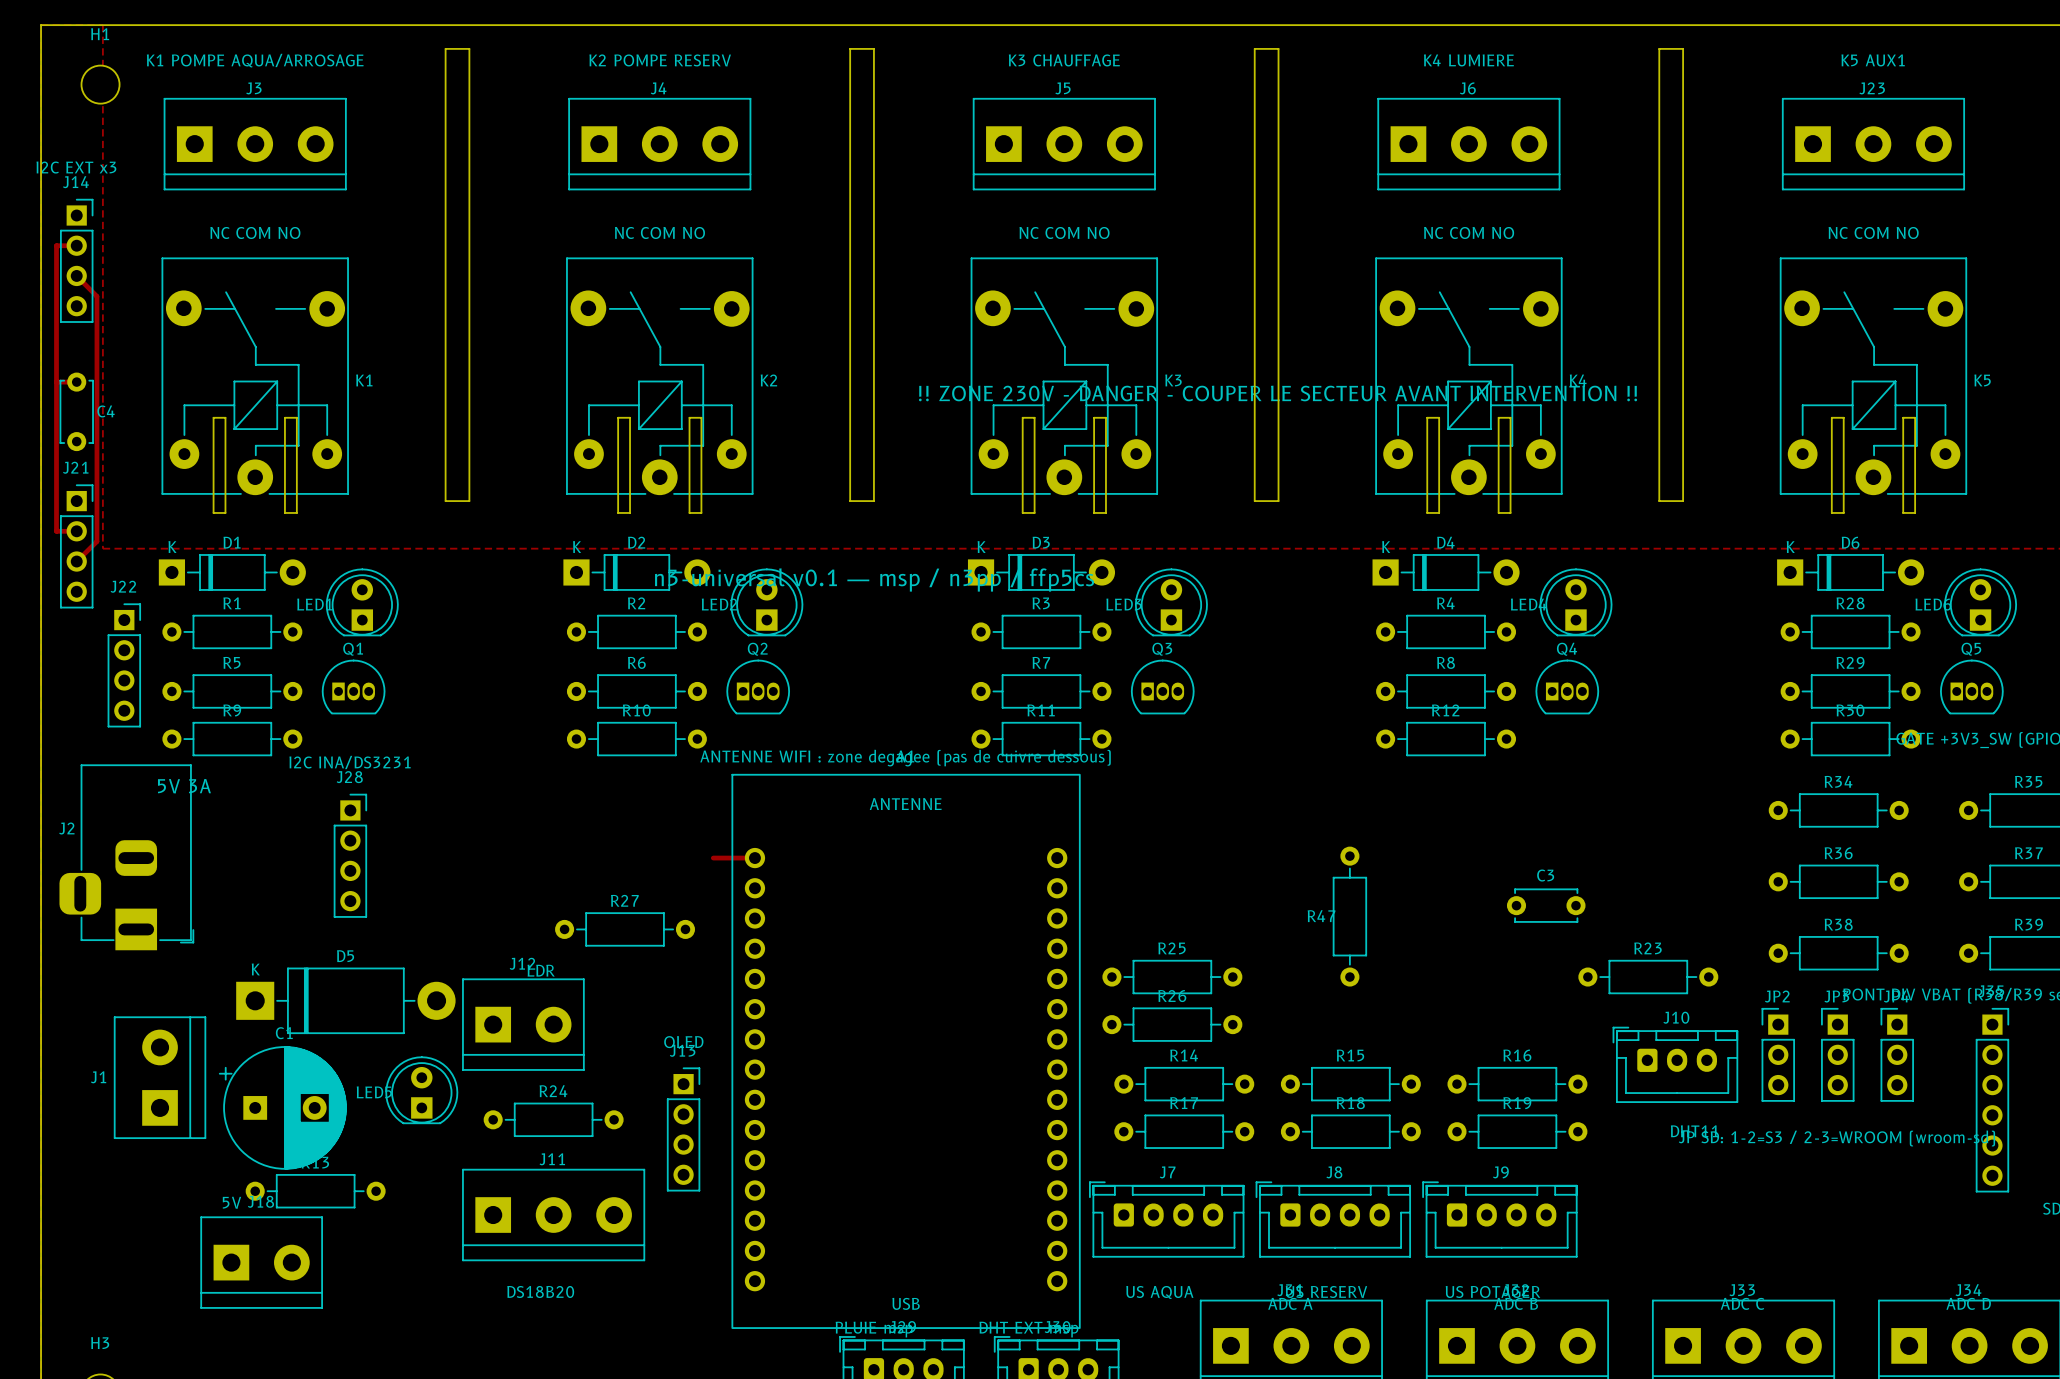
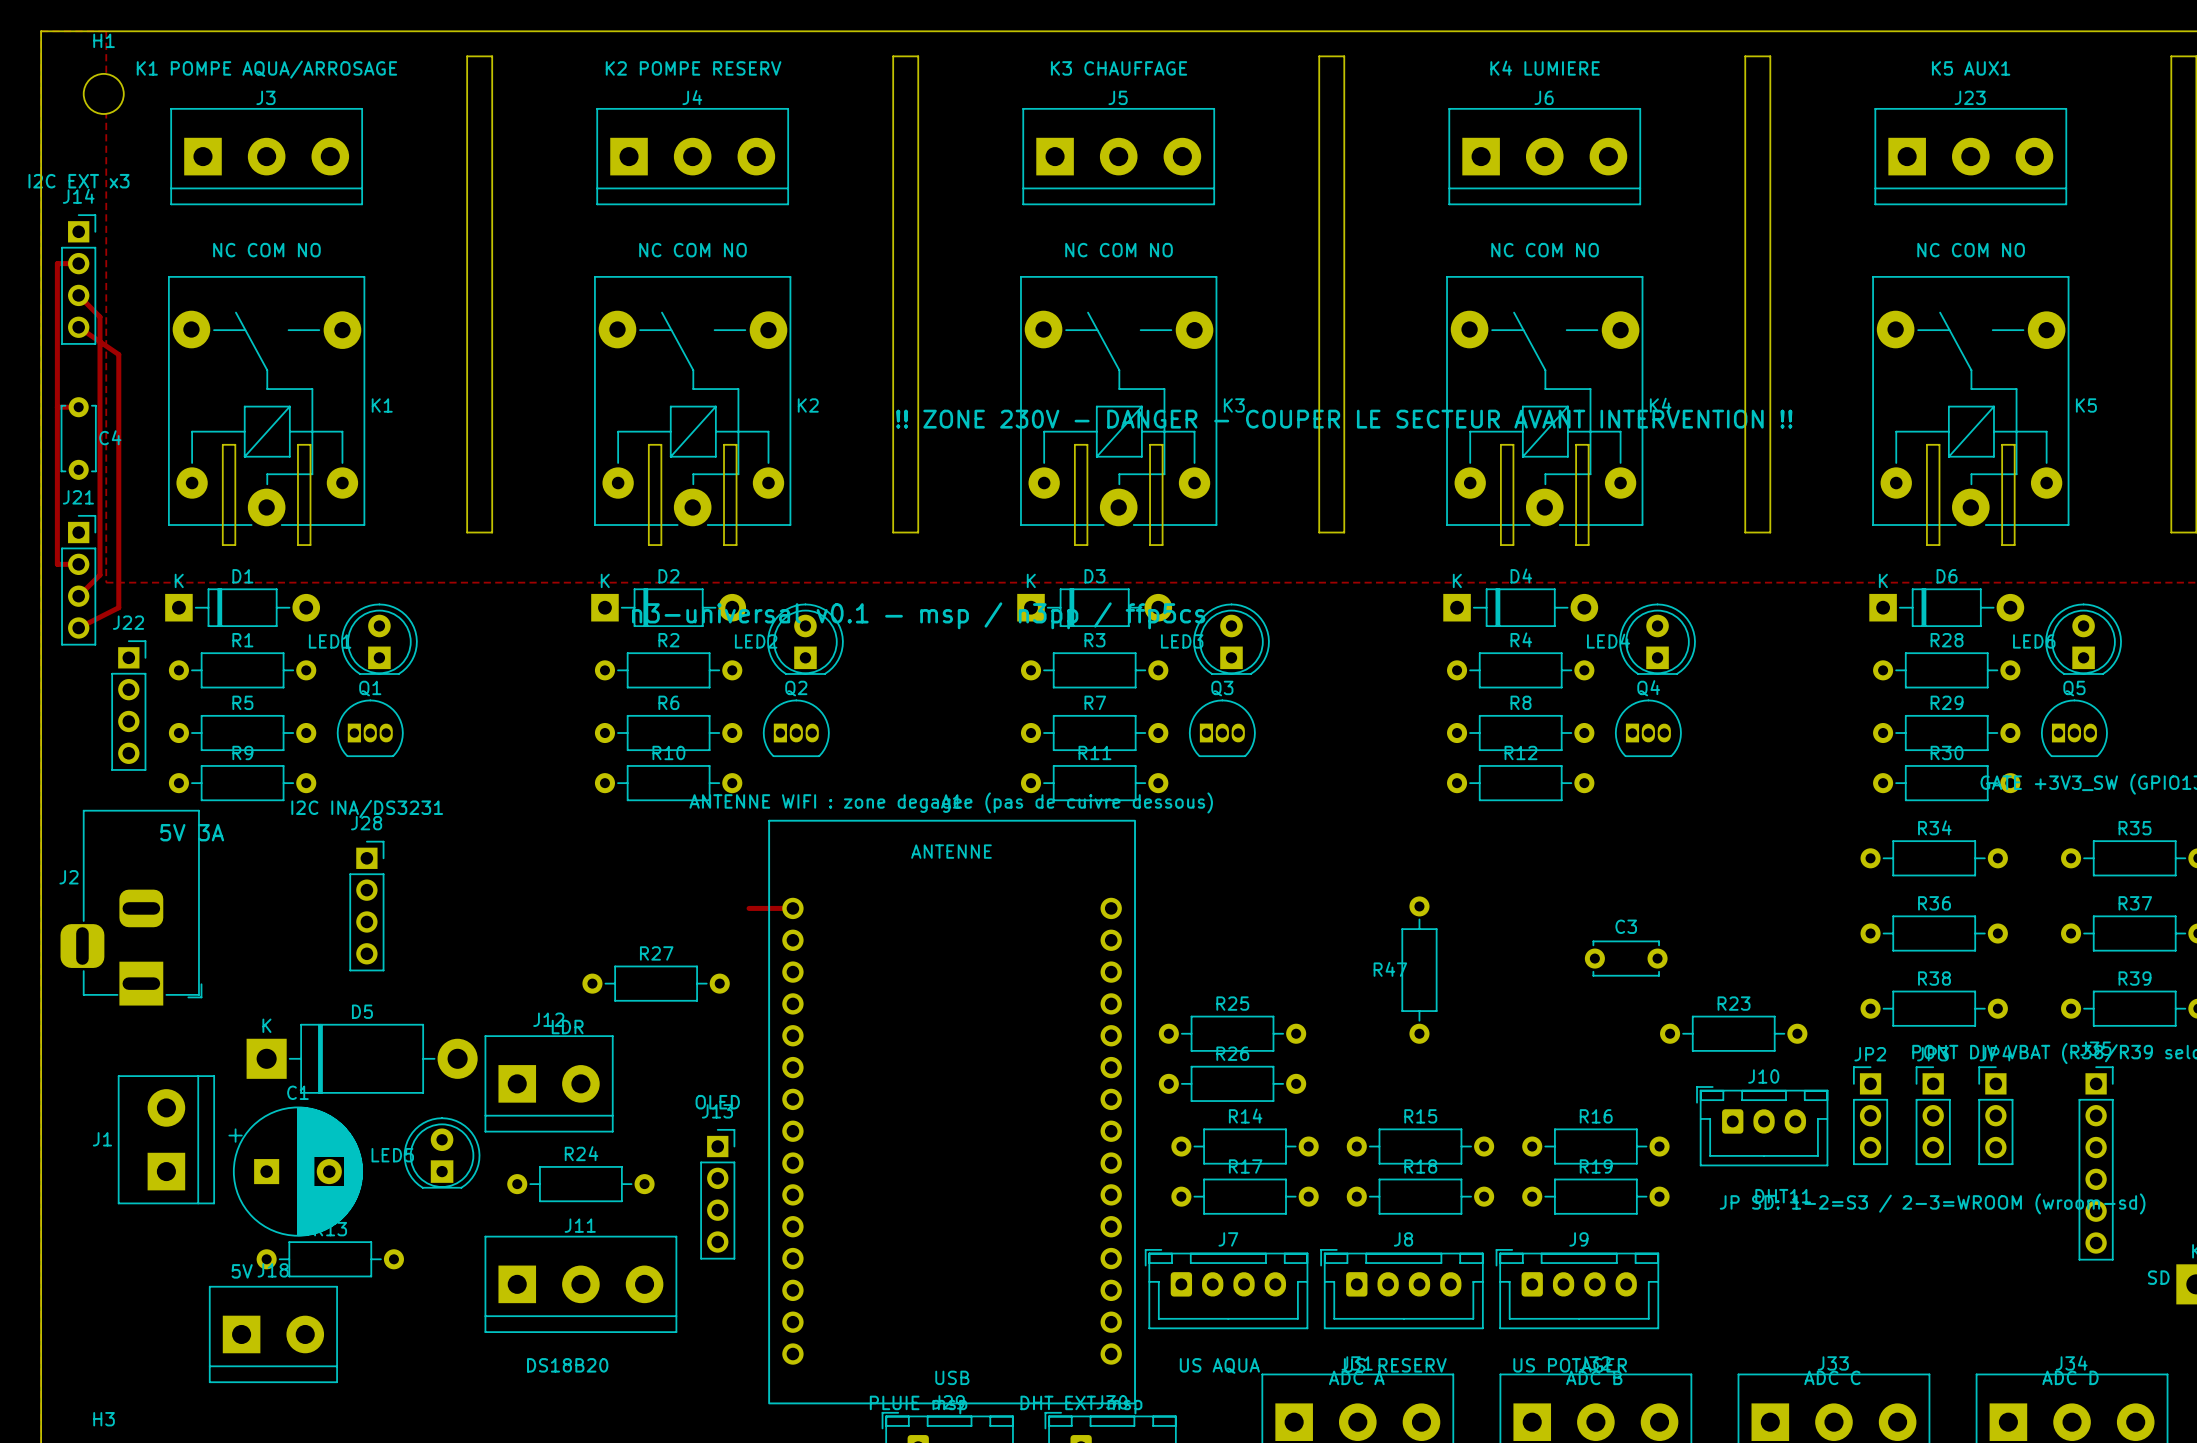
track: none -> (78, 327) (118, 354) (118, 607) (78, 628)

